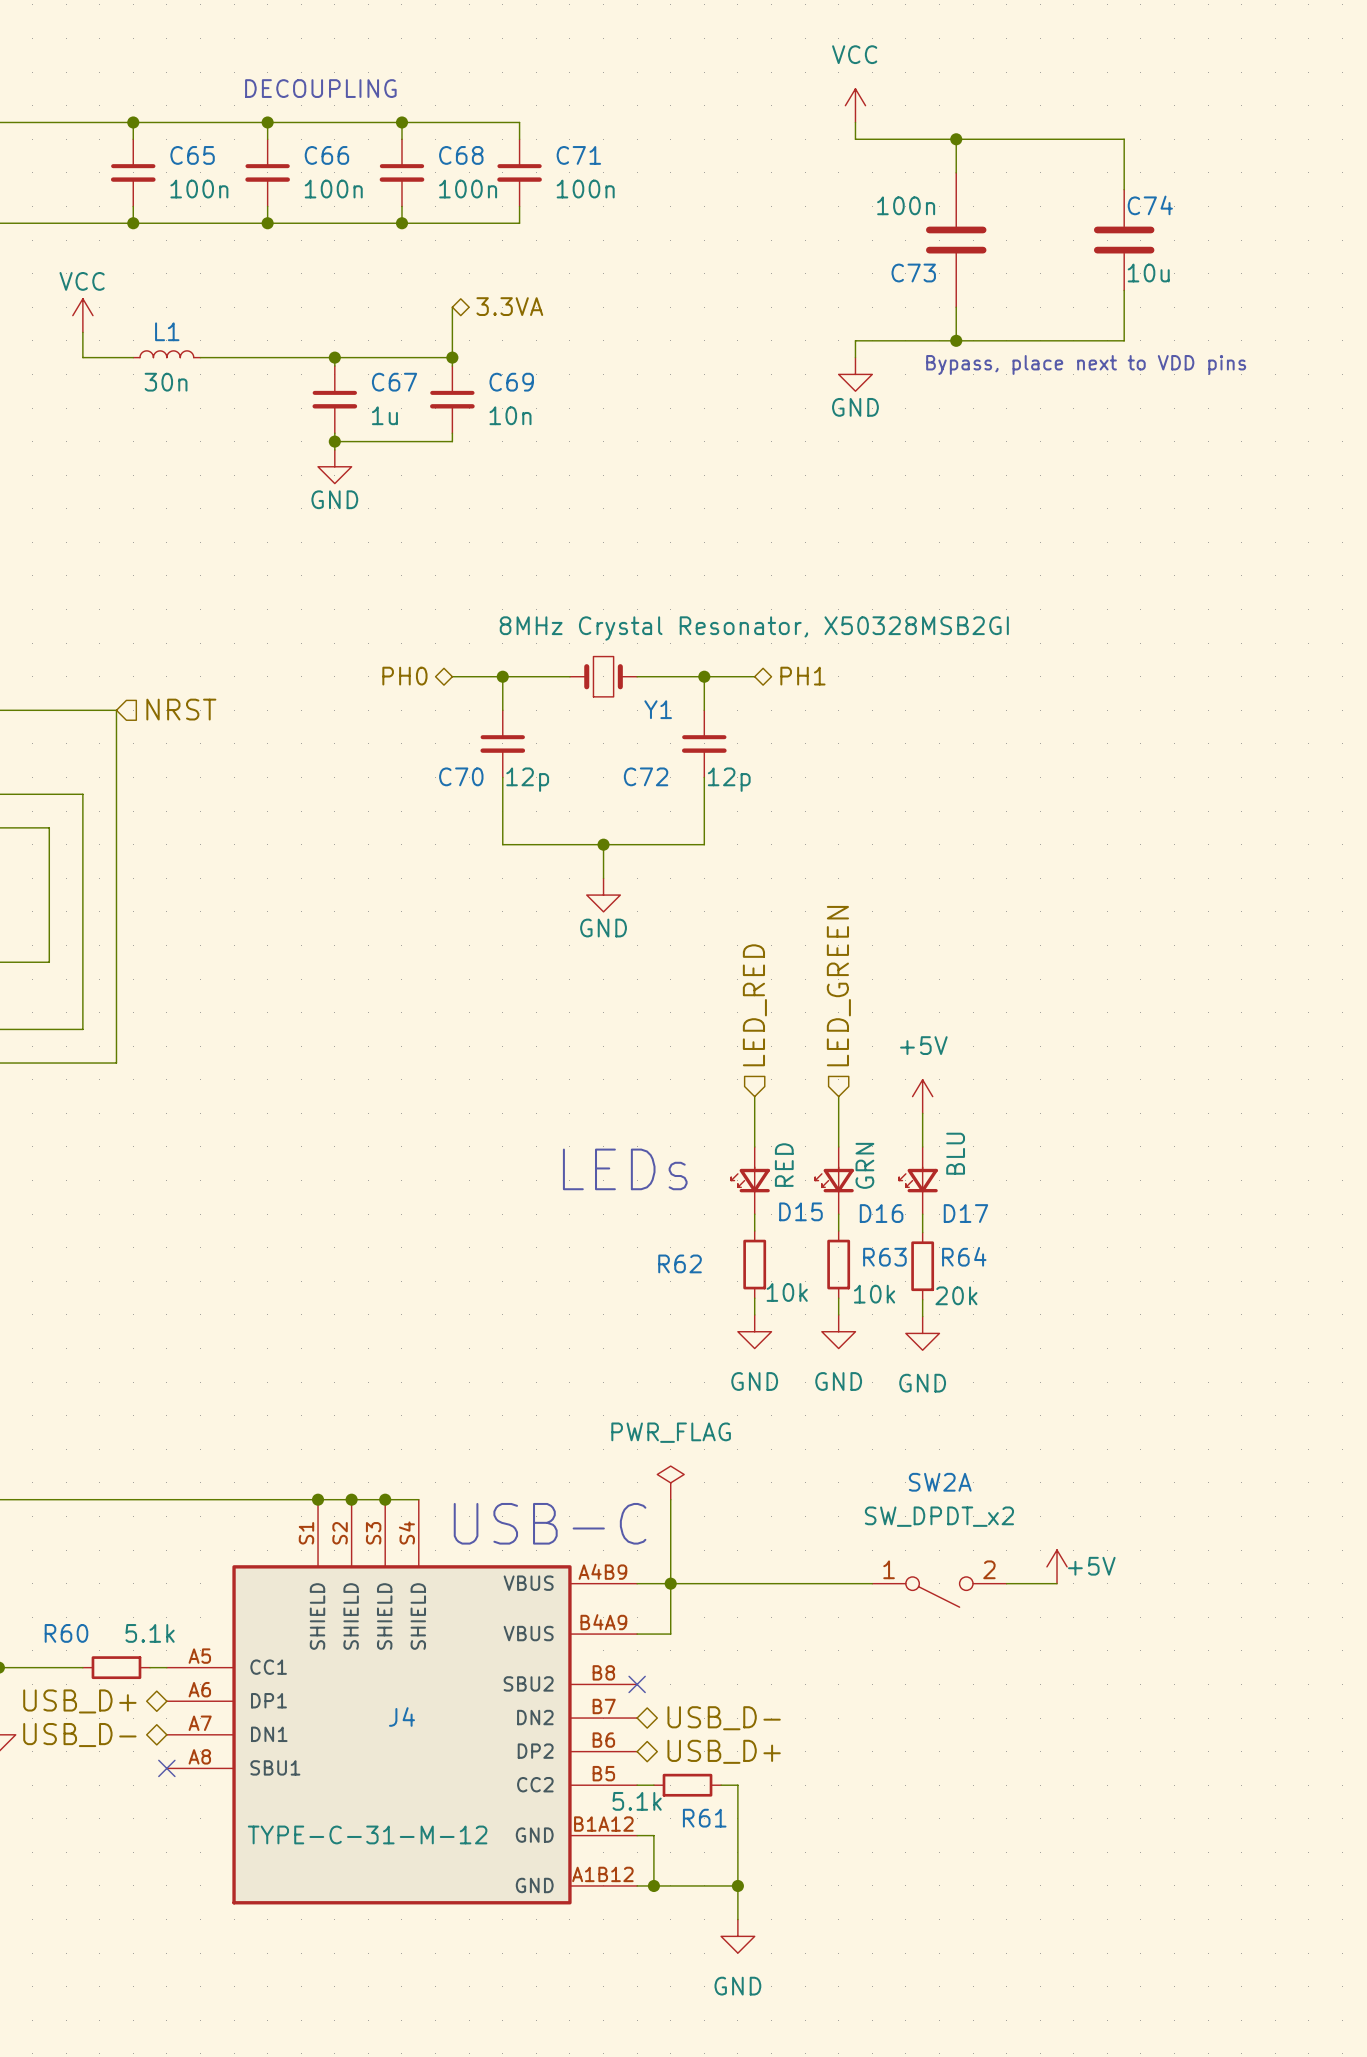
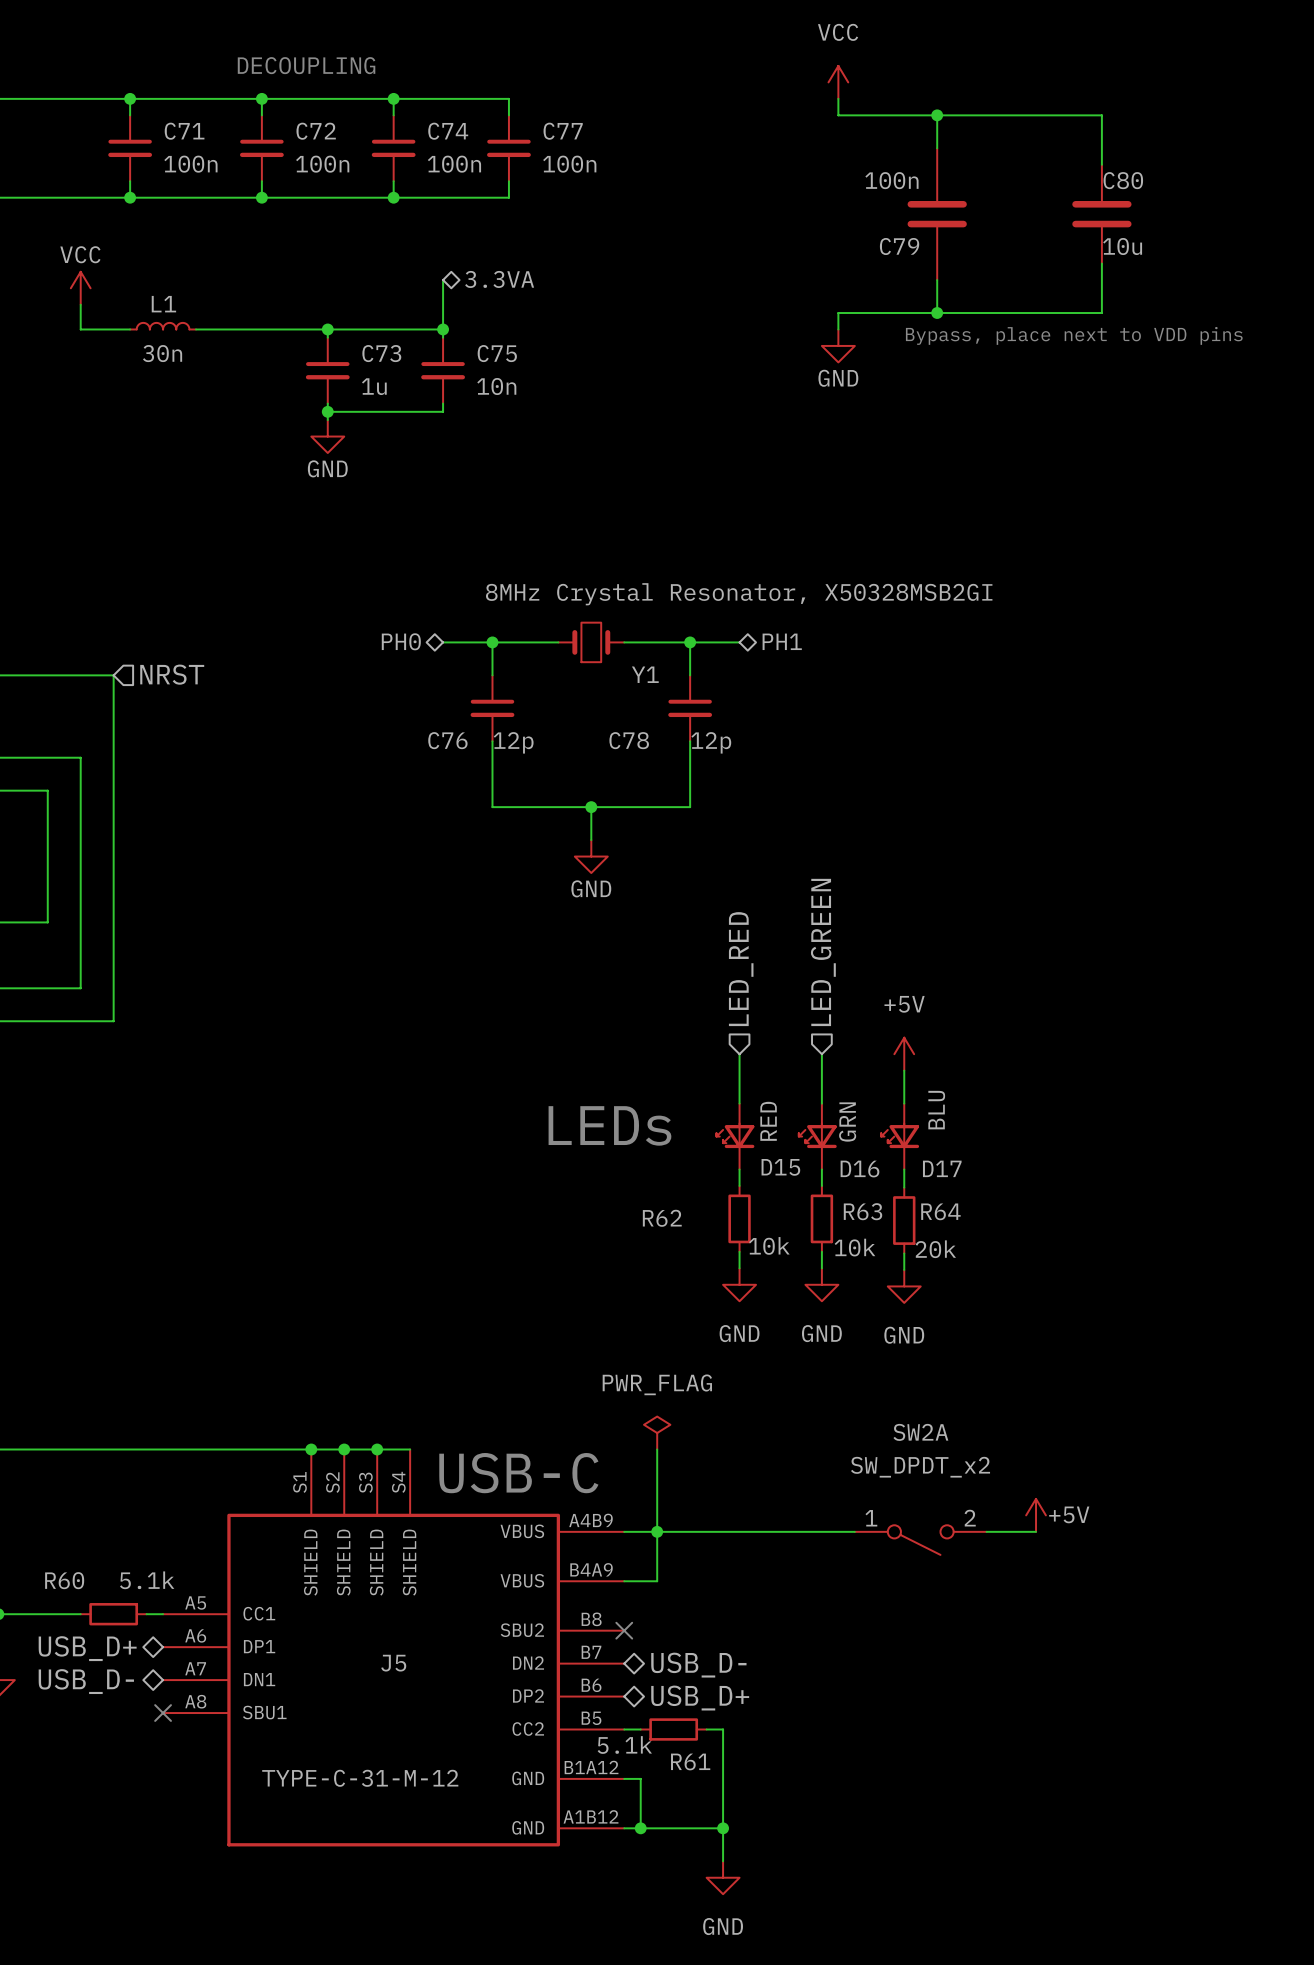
C65 name: C65 (192, 155) -> C71 (184, 131)
C66 name: C66 (326, 155) -> C72 (316, 131)
C68 name: C68 (461, 155) -> C74 (448, 131)
C71 name: C71 (578, 155) -> C77 (563, 131)
C74 name: C74 (1150, 205) -> C80 (1123, 180)
C73 name: C73 (913, 273) -> C79 (899, 246)
C67 name: C67 (394, 382) -> C73 (381, 353)
C69 name: C69 (511, 382) -> C75 (497, 353)
C70 name: C70 (461, 776) -> C76 (447, 740)
C72 name: C72 (646, 776) -> C78 (629, 740)
J4 name: J4 (401, 1717) -> J5 (393, 1663)

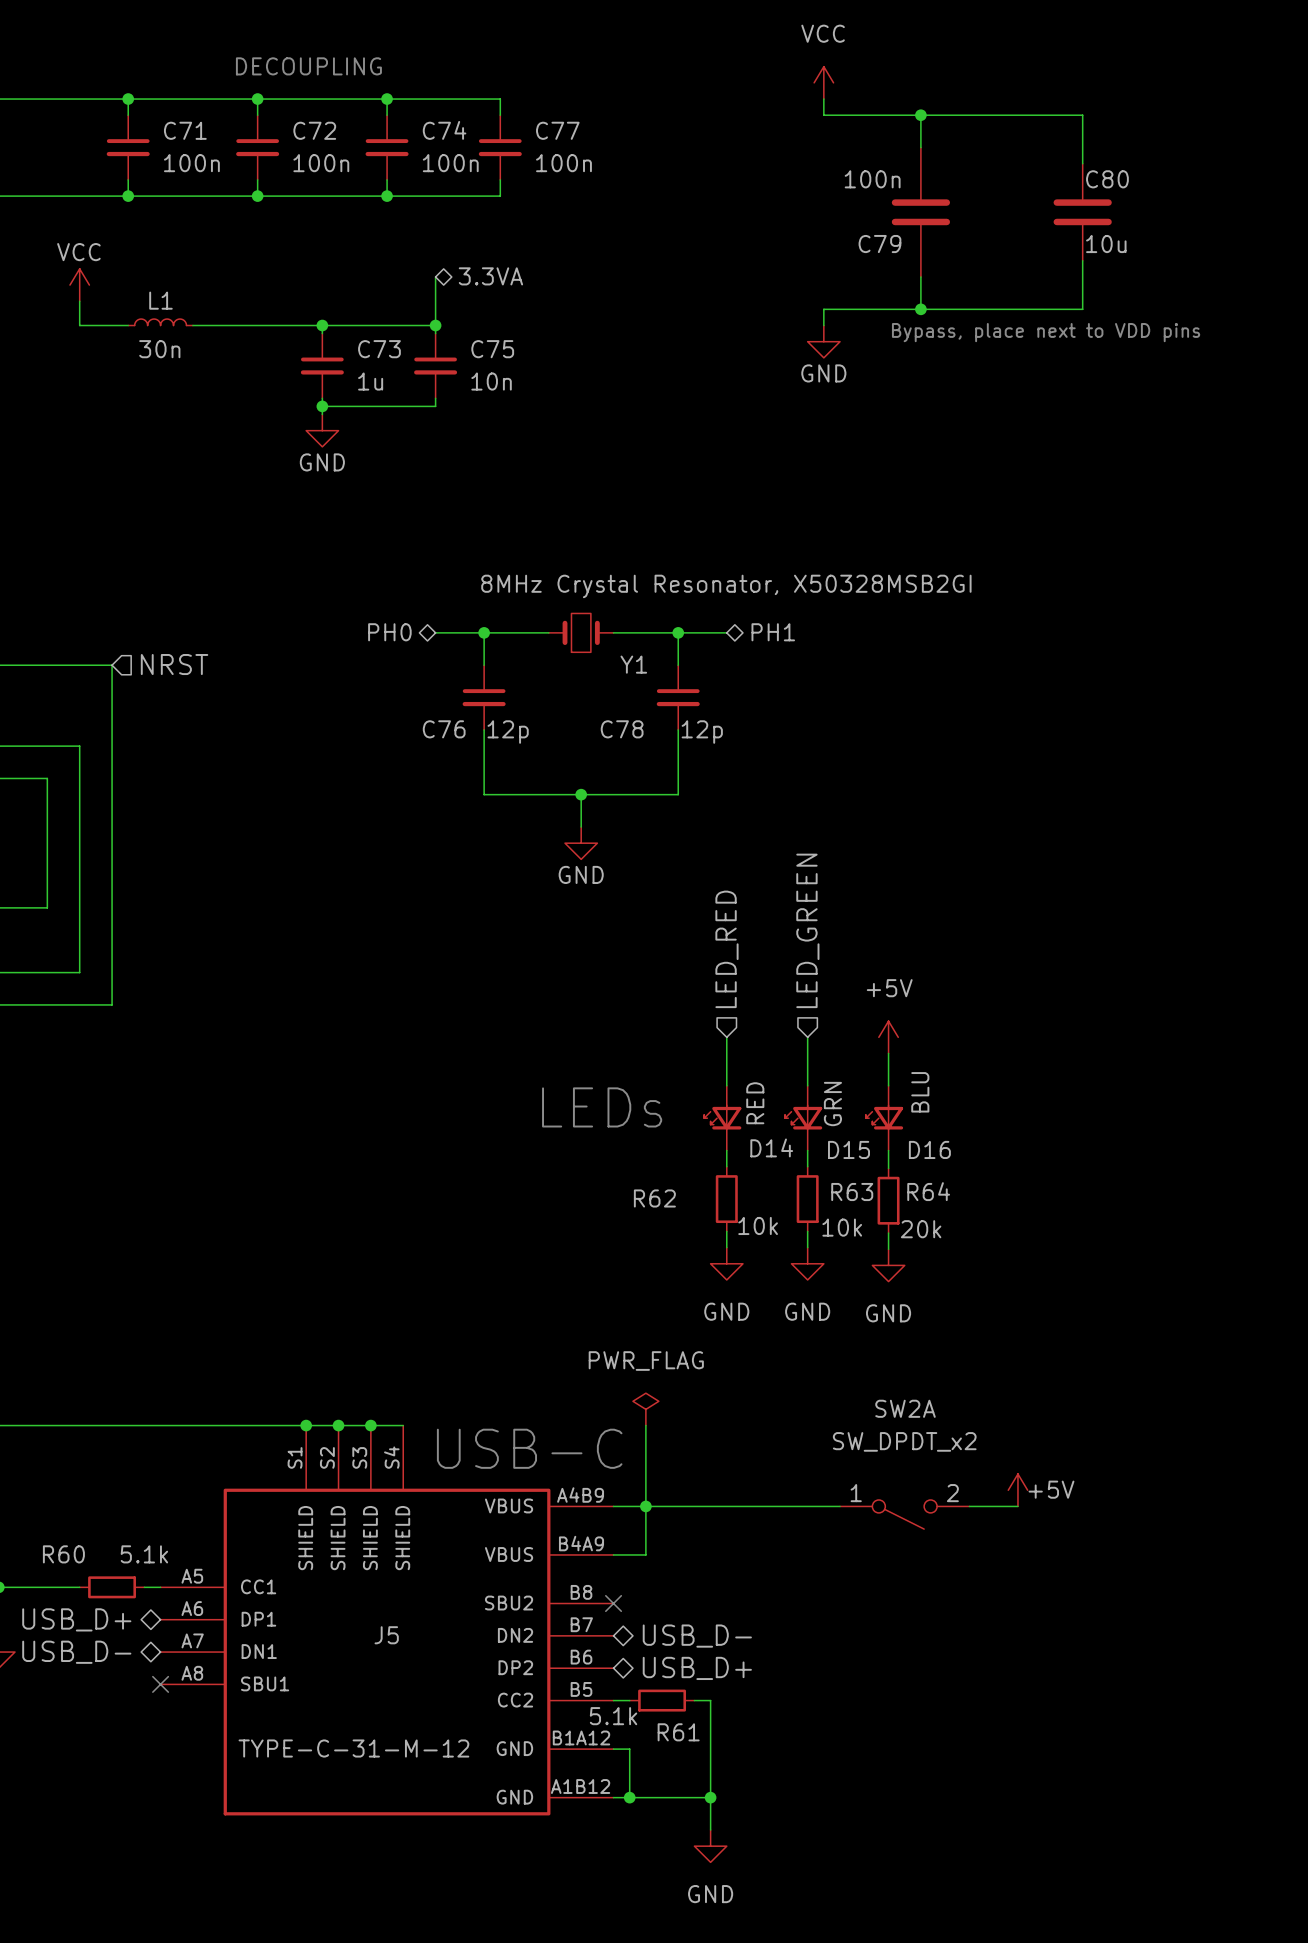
D15 name: D15 (780, 1167) -> D14 (771, 1147)
D17 name: D17 (942, 1168) -> D16 (929, 1149)
D16 name: D16 (859, 1169) -> D15 (849, 1149)

